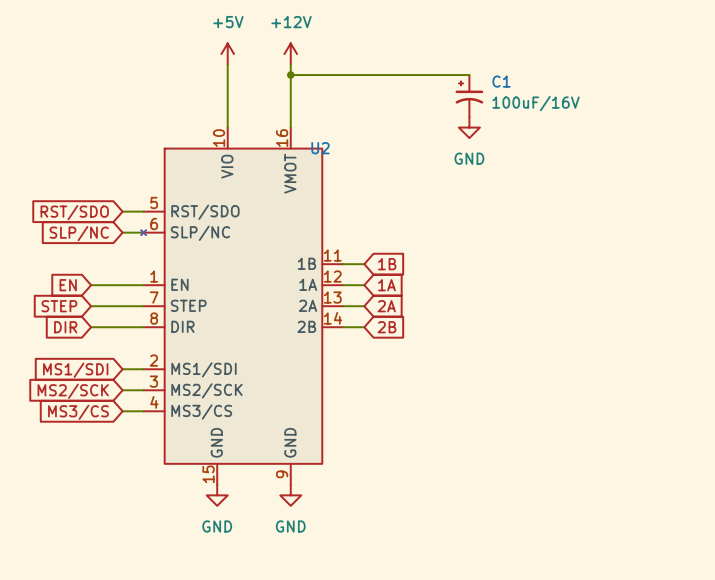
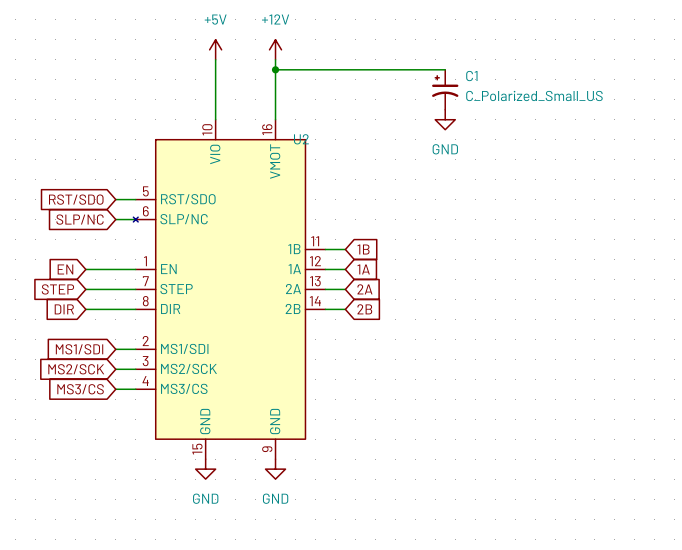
C1 value: 100uF/16V (536, 103) -> C_Polarized_Small_US (534, 95)

